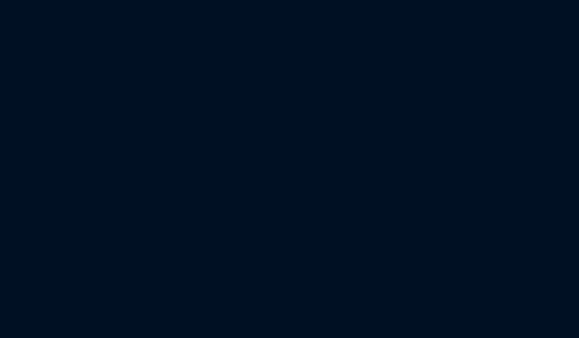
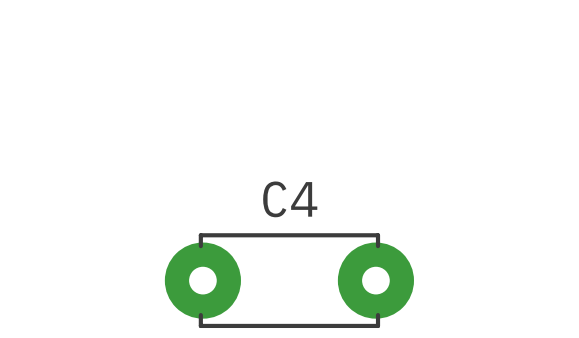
C4: none -> (289, 280)

